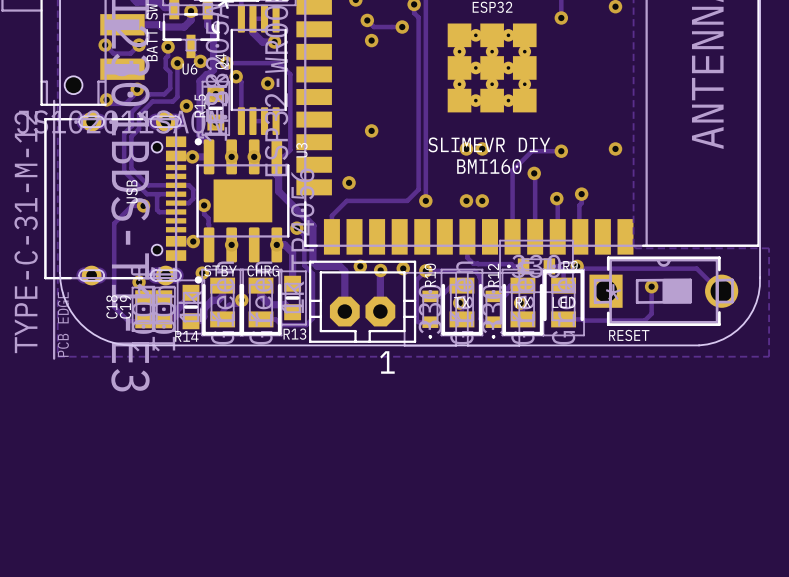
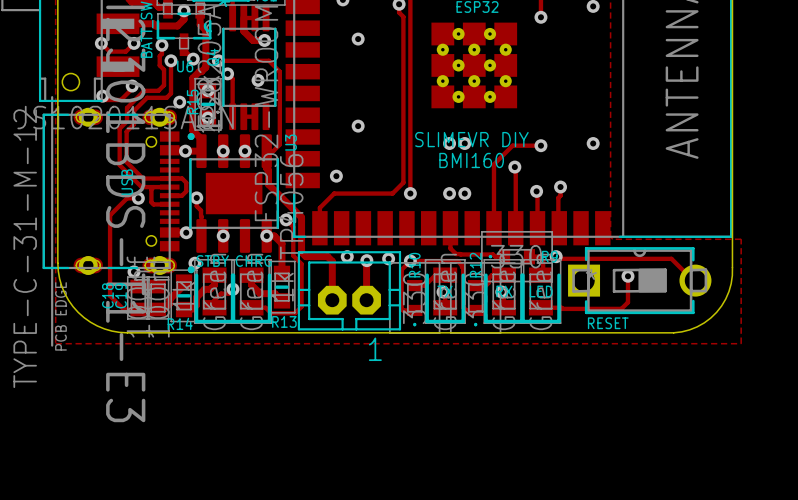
track: (367, 20) (373, 27) (402, 27) -> none
via: (367, 20) -> none
via: (402, 27) -> none
LED rotation: 0° (563, 302) -> 180° (540, 291)

